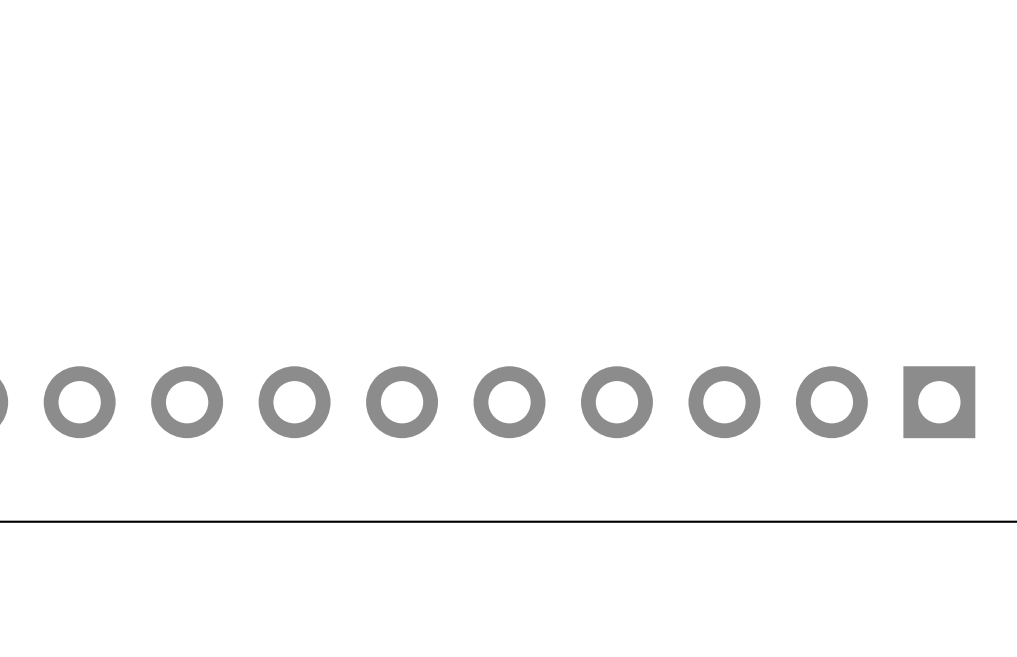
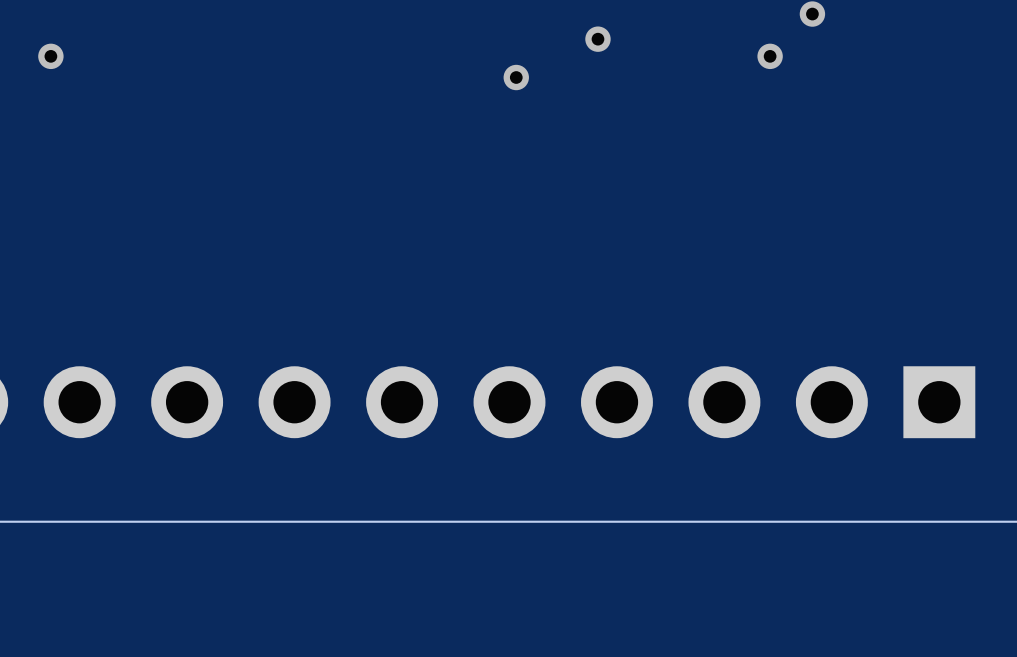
via: none -> (812, 14)
via: none -> (597, 39)
via: none -> (50, 56)
via: none -> (770, 56)
via: none -> (516, 77)

